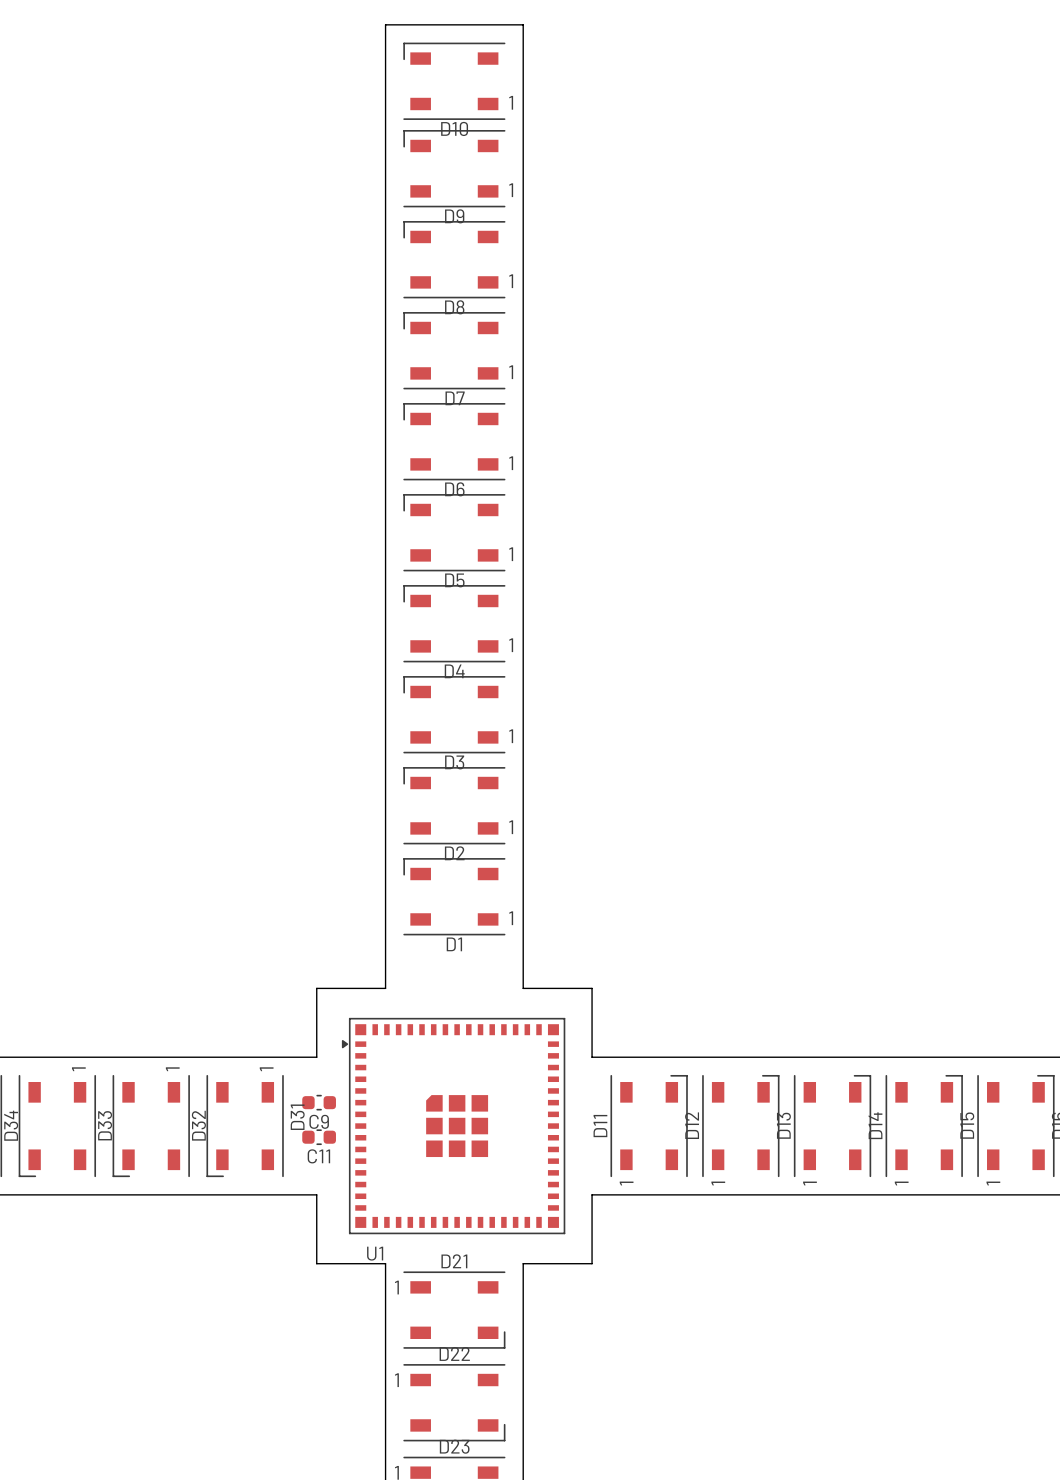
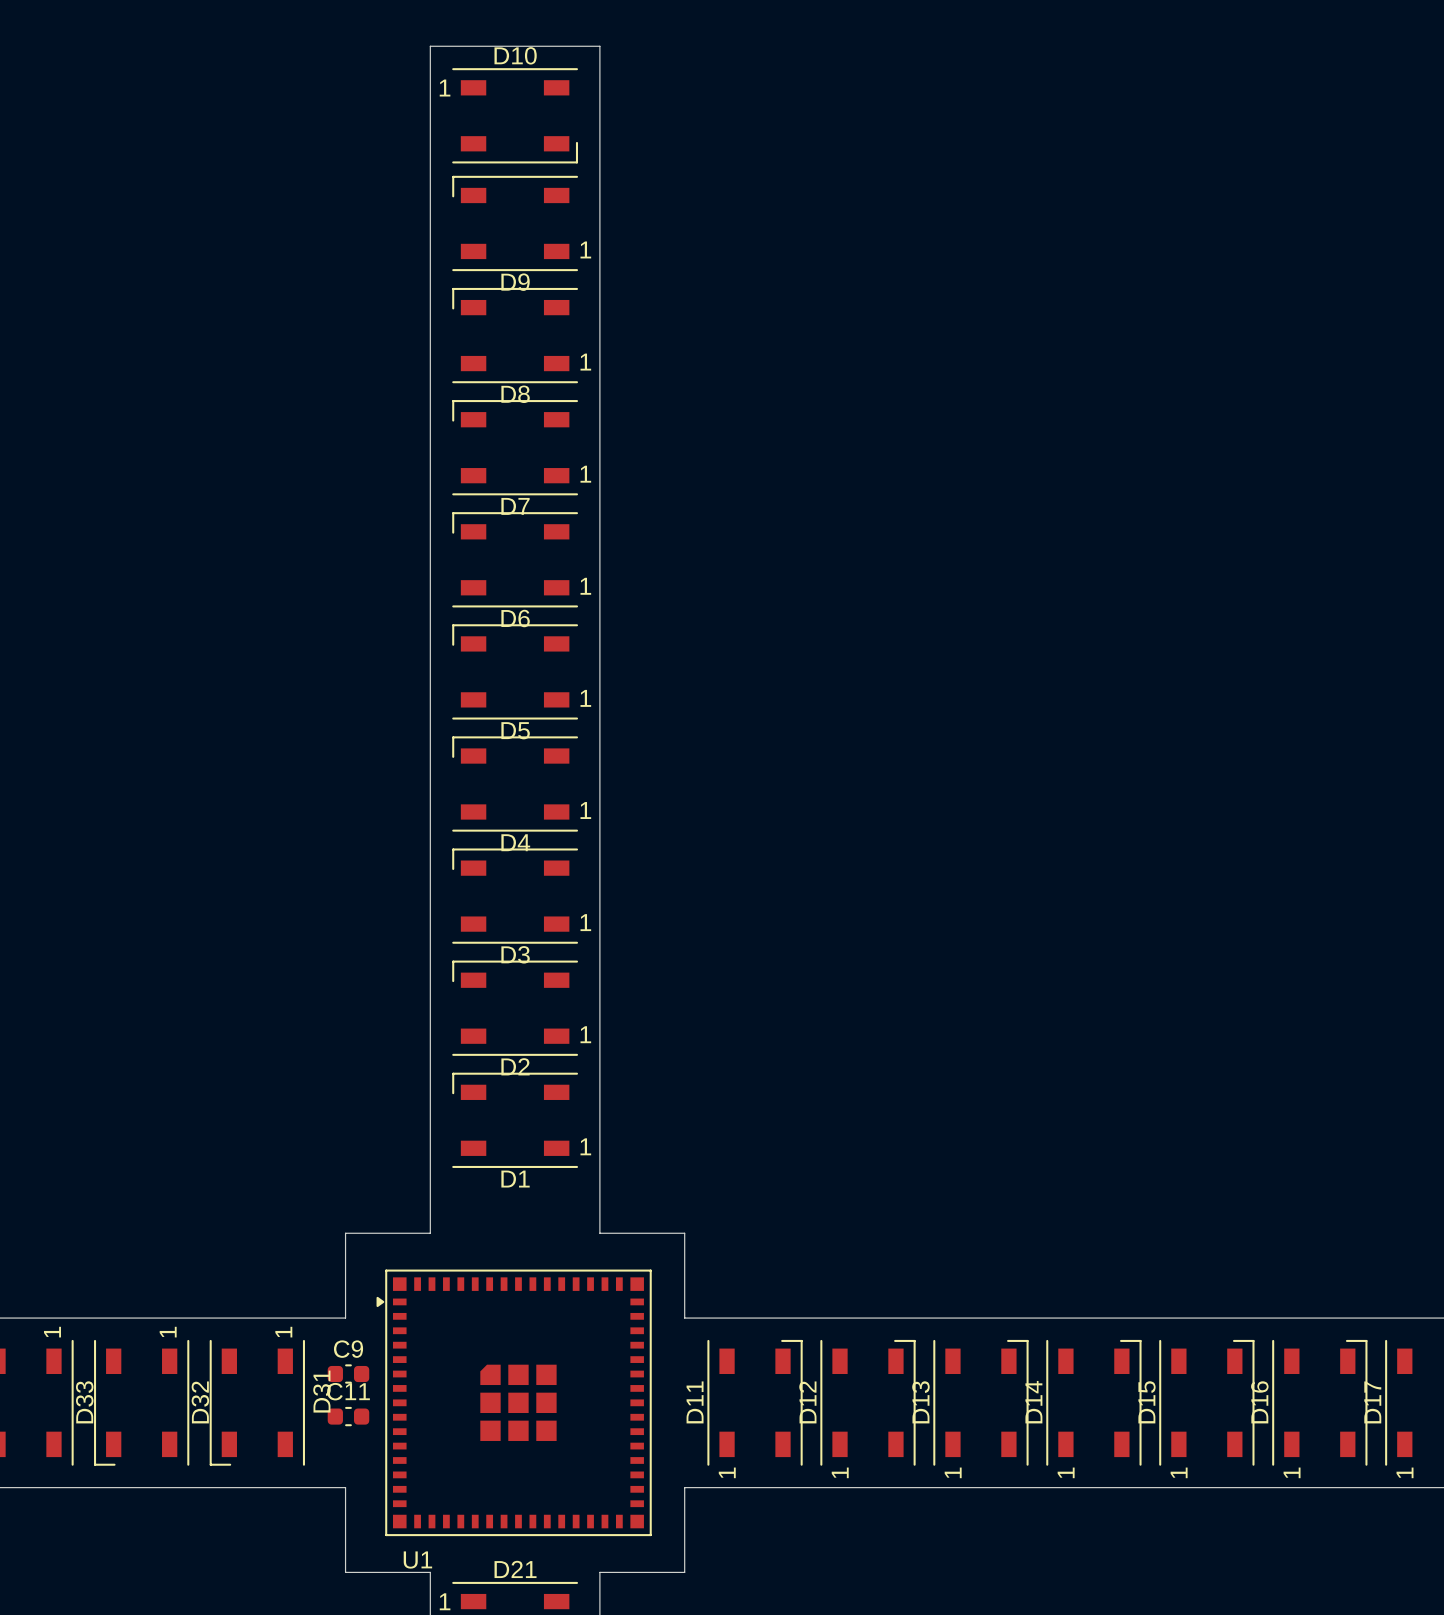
D10 rotation: 0° (454, 81) -> 180° (515, 115)
C9 name position: C9 (319, 1121) -> C9 (348, 1349)
C11 name position: C11 (318, 1156) -> C11 (348, 1391)

